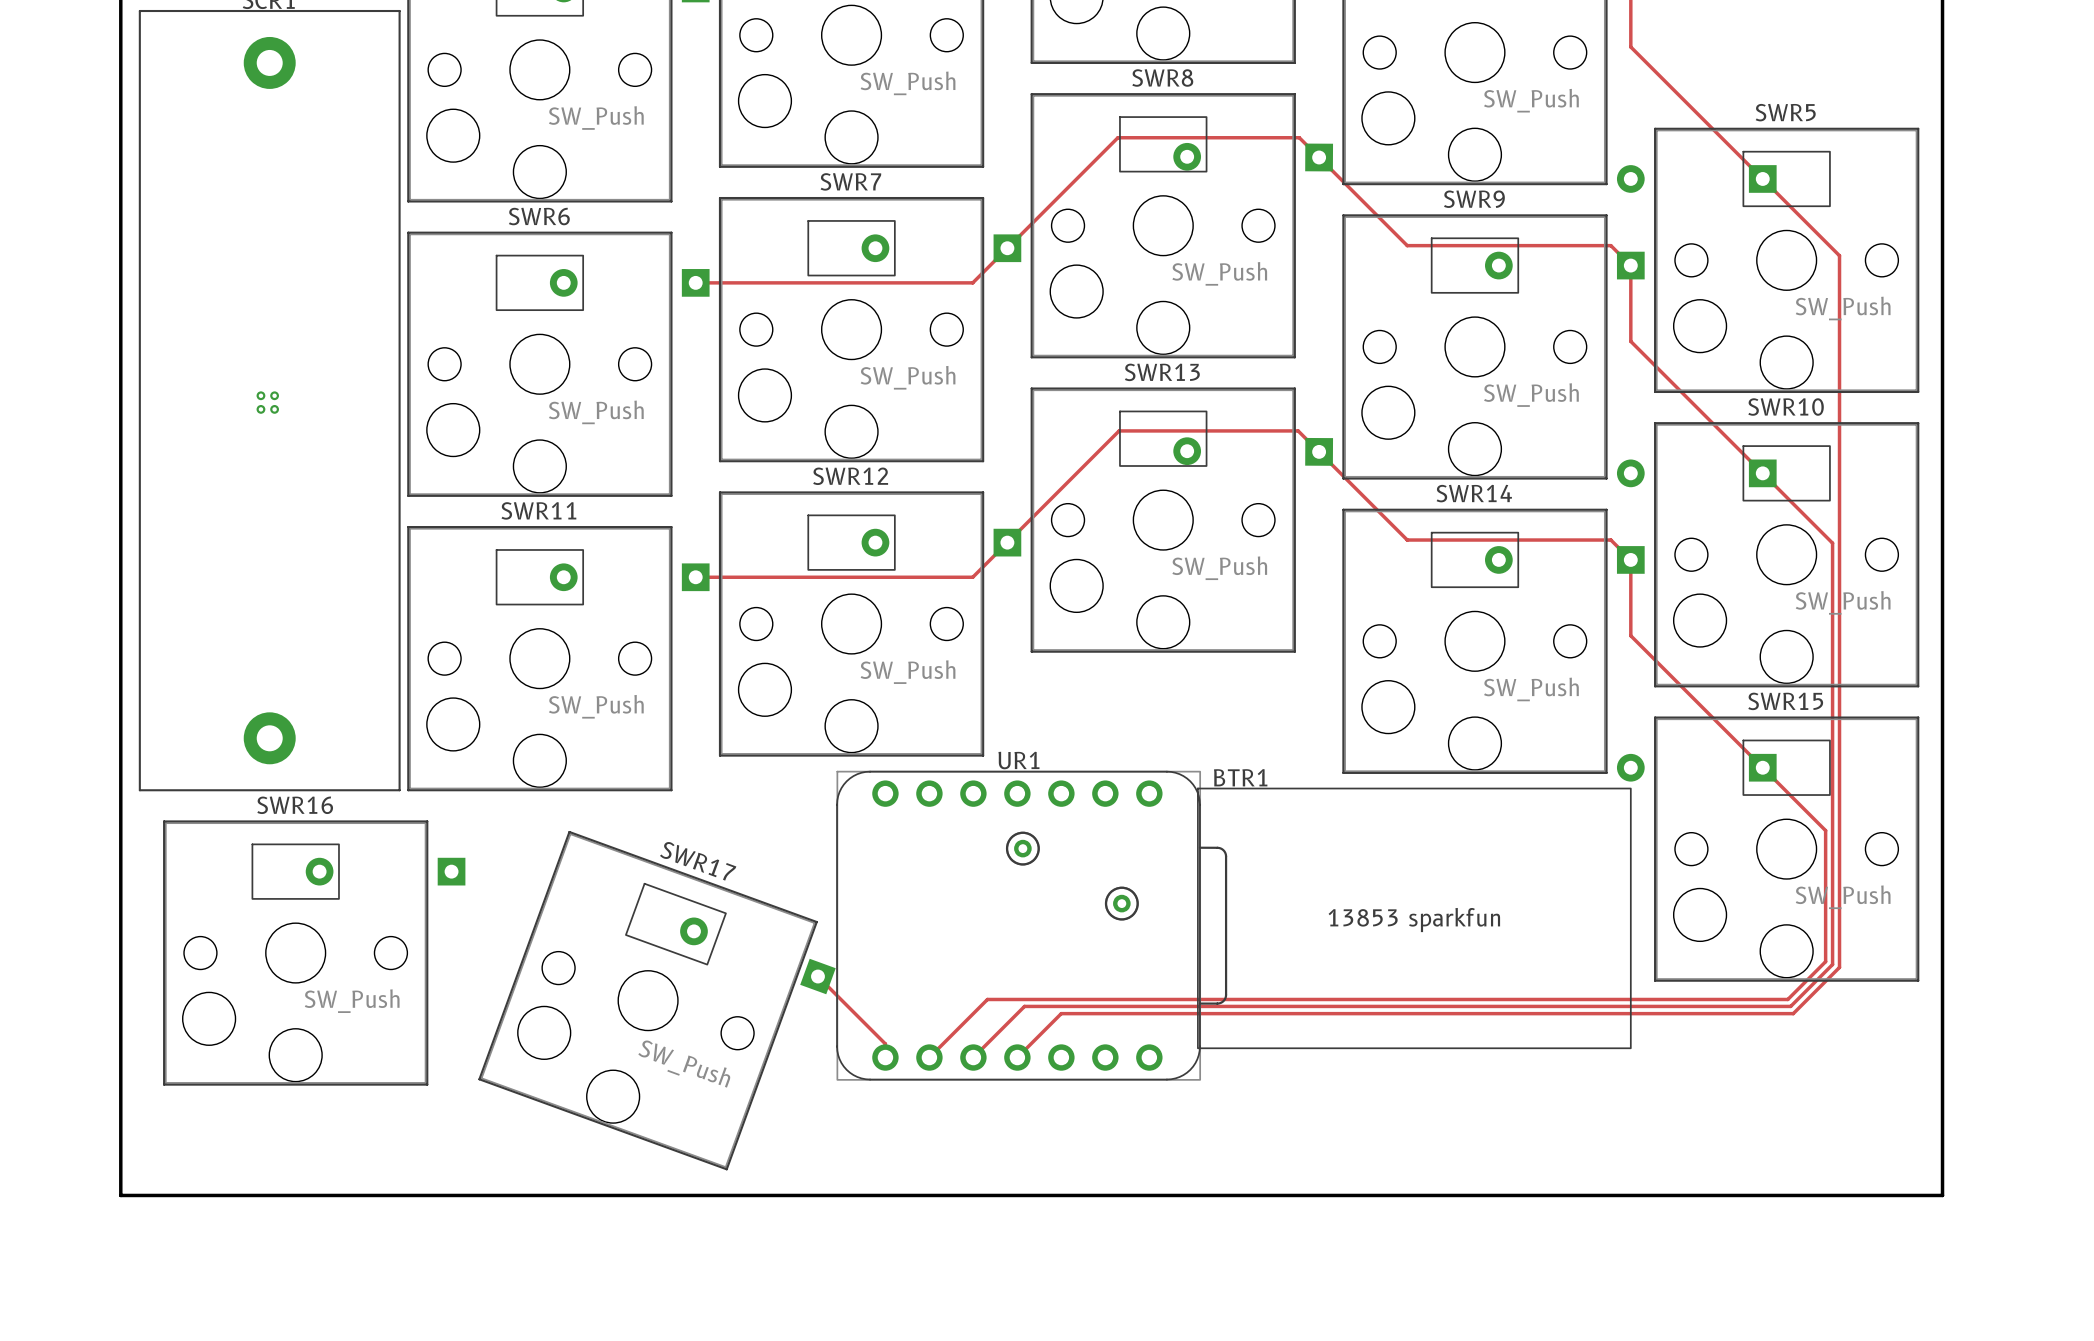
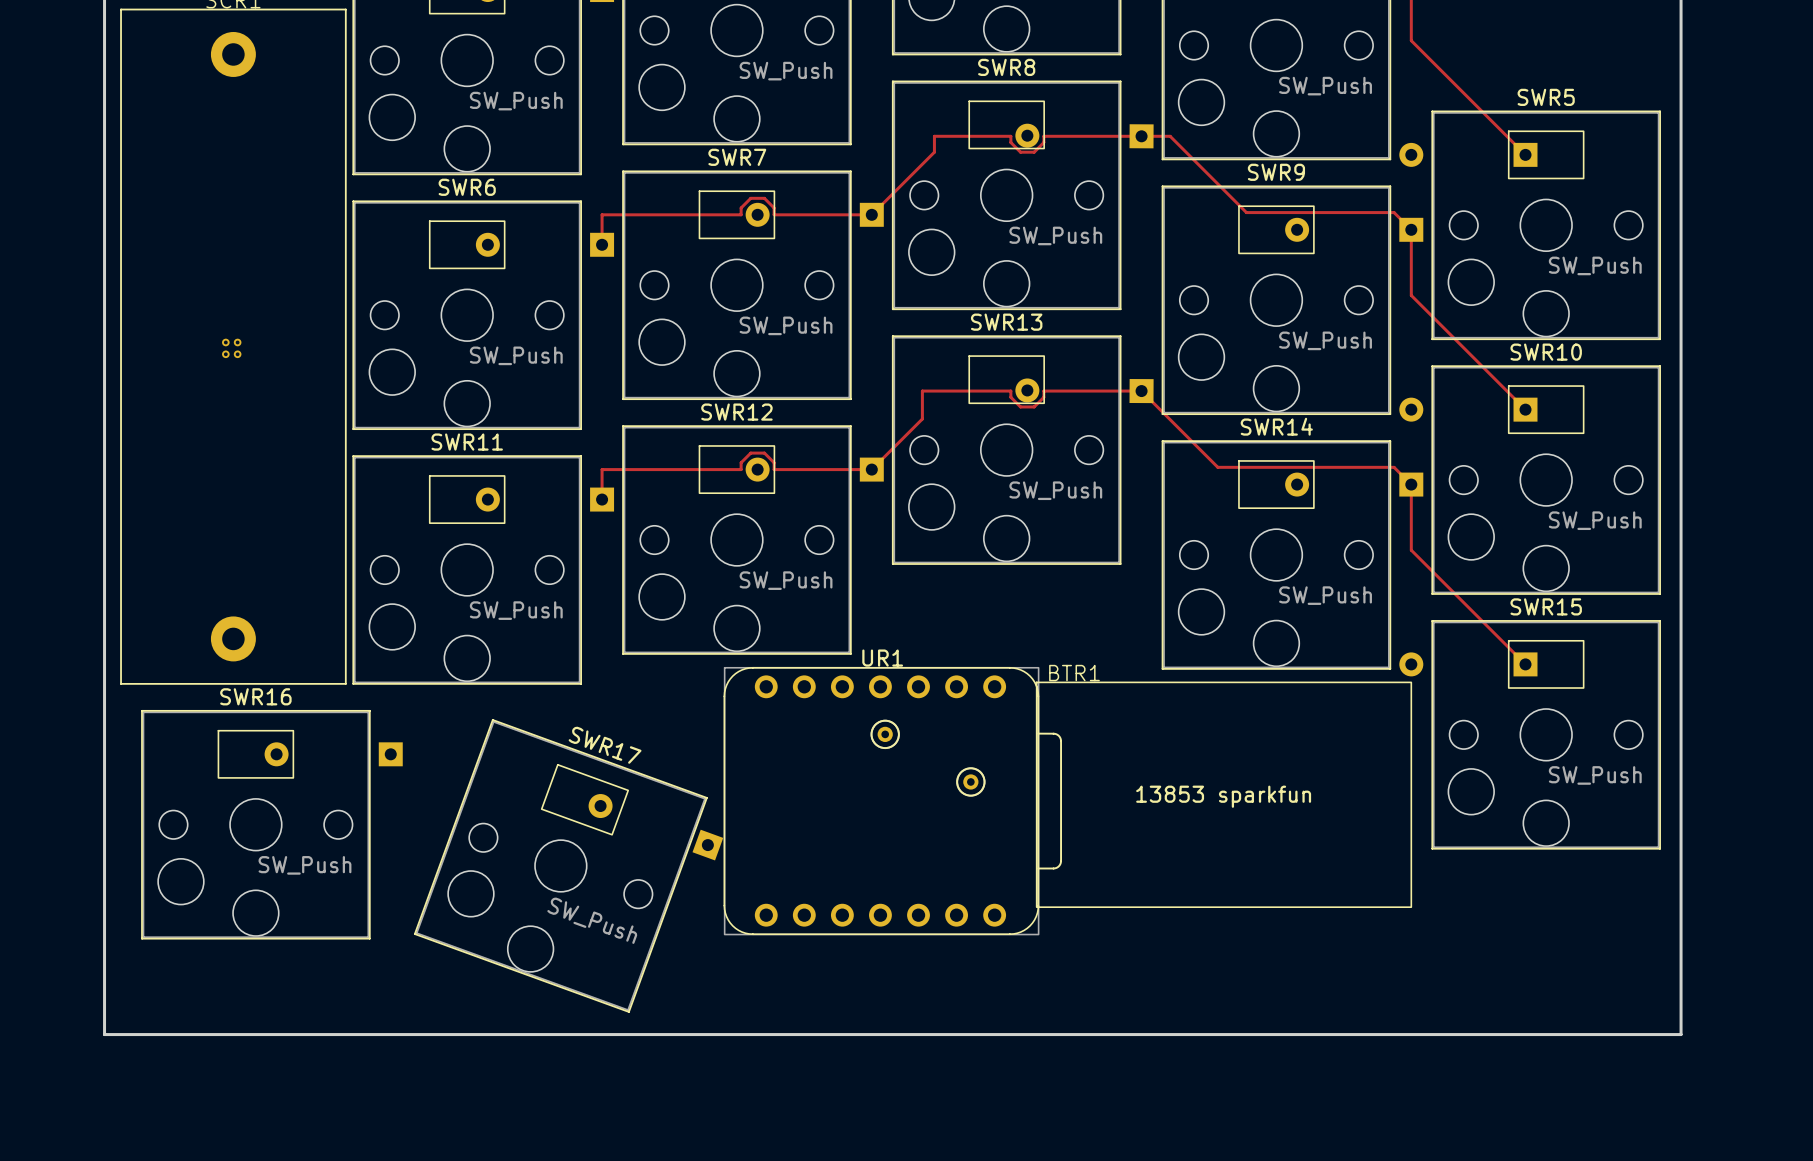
track: (1079, 175) (1117, 137) (1299, 137) (1407, 245) (1440, 245) -> (934, 152) (934, 136) (1010, 136) (1010, 142) (1020, 152) (1034, 152) (1043, 142) (1043, 136) (1170, 136) (1246, 212)
track: (1762, 178) (1839, 255) (1839, 967) (1793, 1013) (1061, 1013) (1017, 1057) -> none
track: (1013, 248) (1007, 248) (972, 282) (695, 282) -> (871, 214) (774, 214) (774, 207) (764, 198) (750, 198) (741, 207) (741, 214) (602, 214) (602, 244)
track: (1319, 451) (1298, 430) (1119, 430) (1065, 484) -> (1141, 391) (1043, 391) (1043, 397) (1034, 406) (1020, 406) (1010, 397) (1010, 391) (922, 391) (922, 418)
track: (1762, 473) (1832, 543) (1832, 964) (1790, 1006) (1024, 1006) (973, 1057) -> none
track: (1007, 542) (972, 577) (695, 577) -> (871, 469) (774, 469) (774, 462) (764, 453) (750, 453) (741, 462) (741, 469) (602, 469) (602, 499)
track: (1762, 767) (1825, 830) (1825, 961) (1787, 999) (987, 999) (929, 1057) -> none
track: (817, 976) (885, 1043) (885, 1057) -> none

